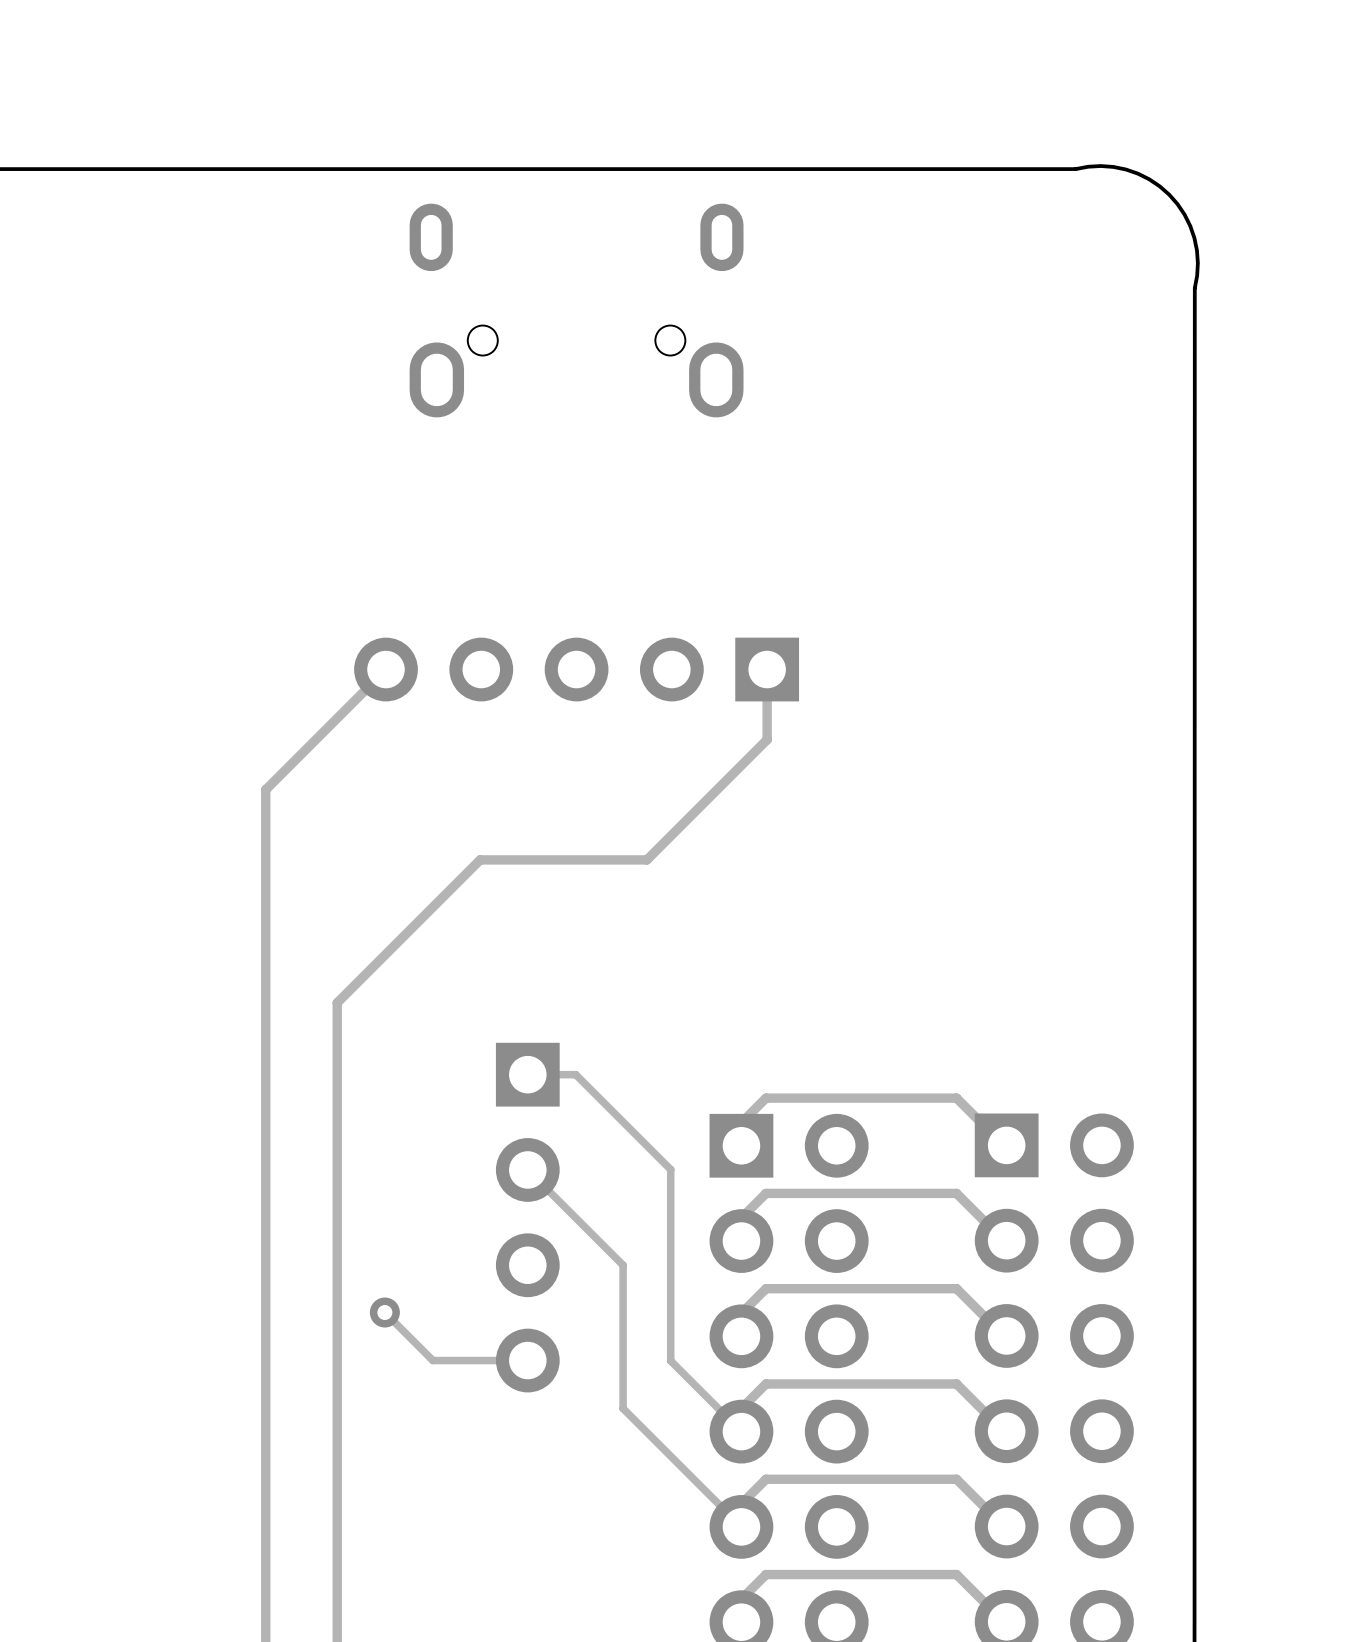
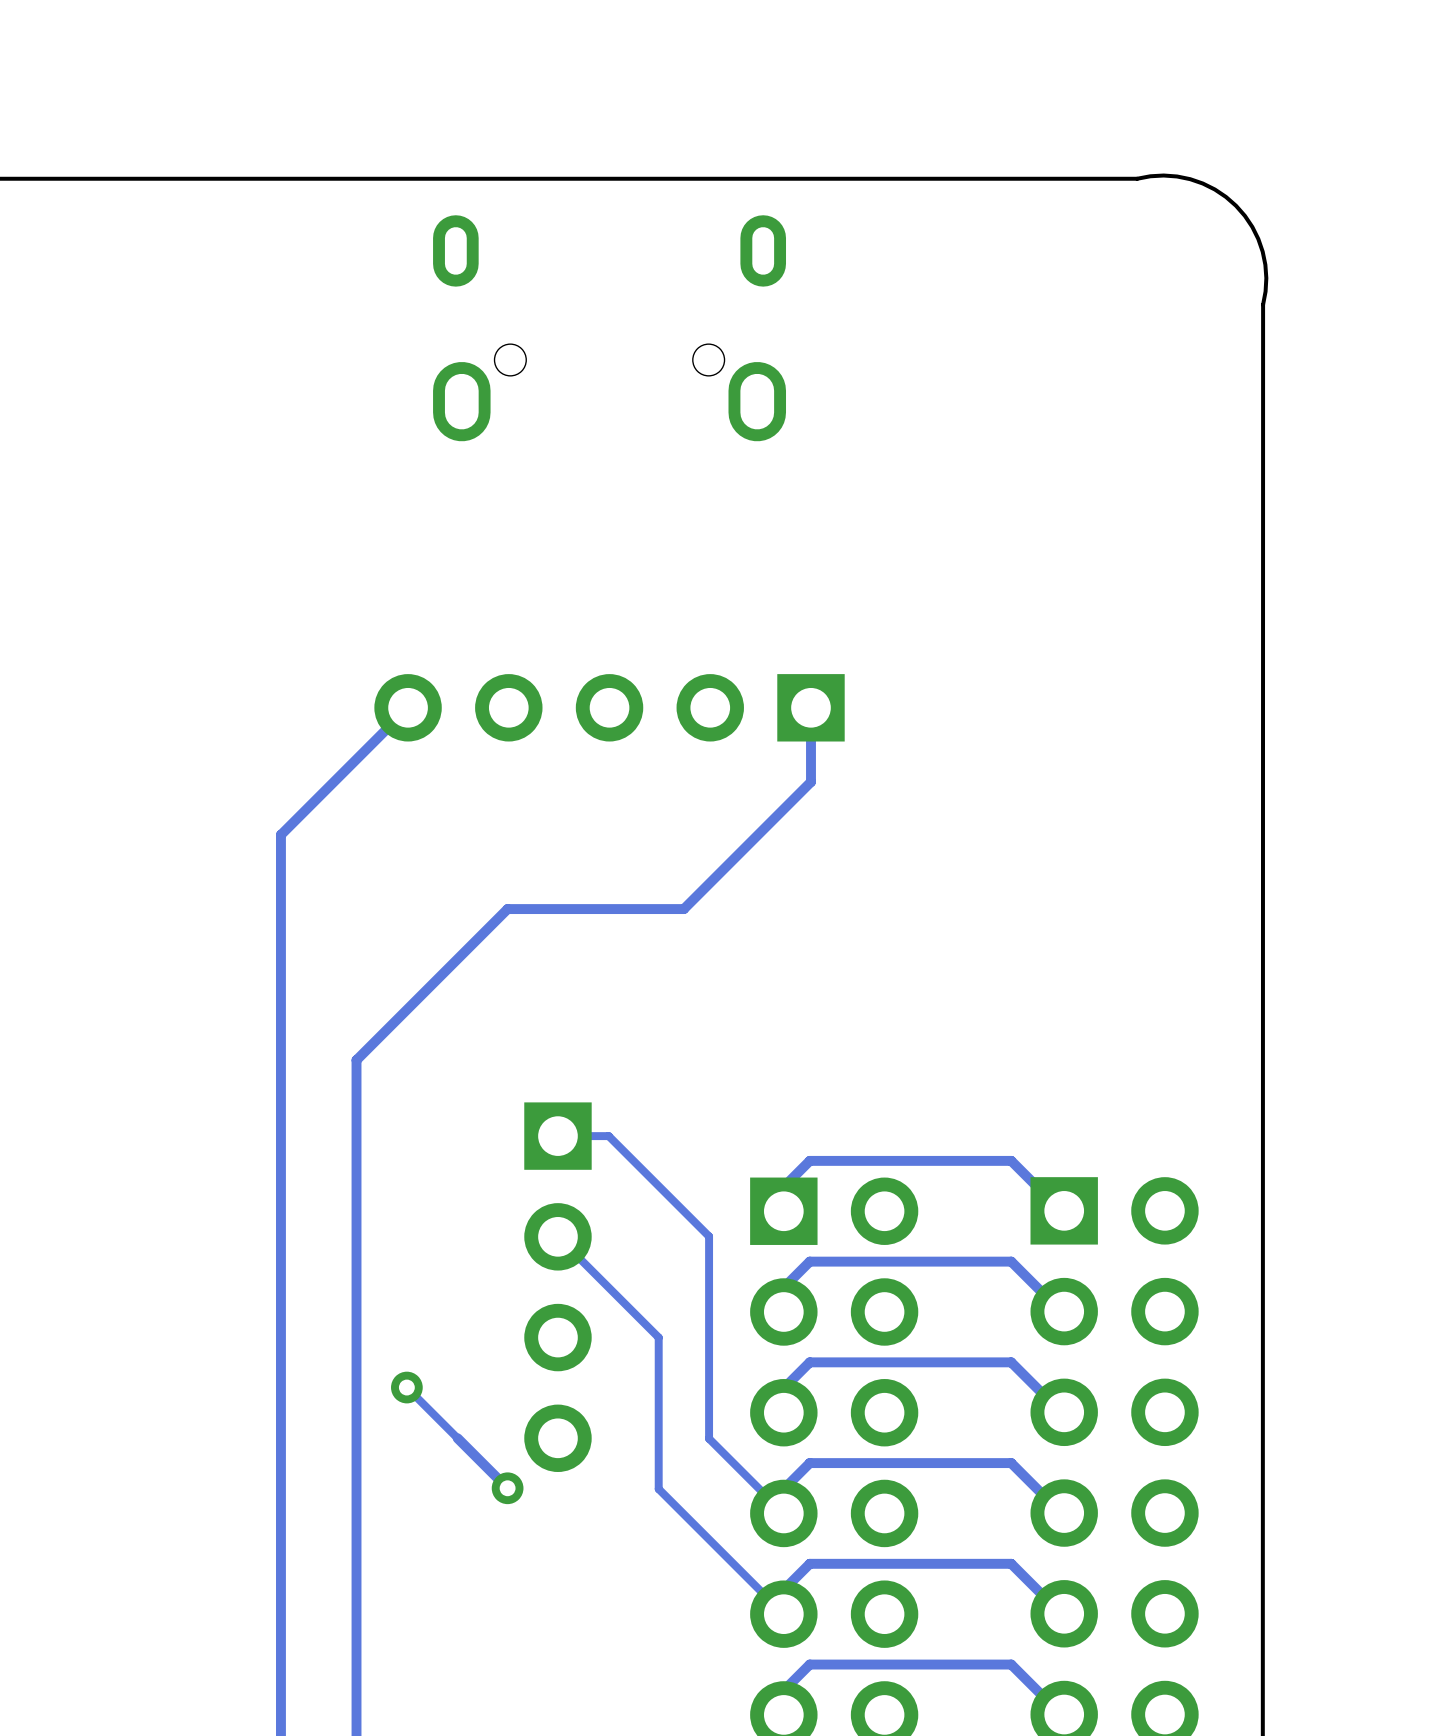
track: (527, 1360) (432, 1360) -> (507, 1488) (457, 1438)
via: none -> (507, 1488)

